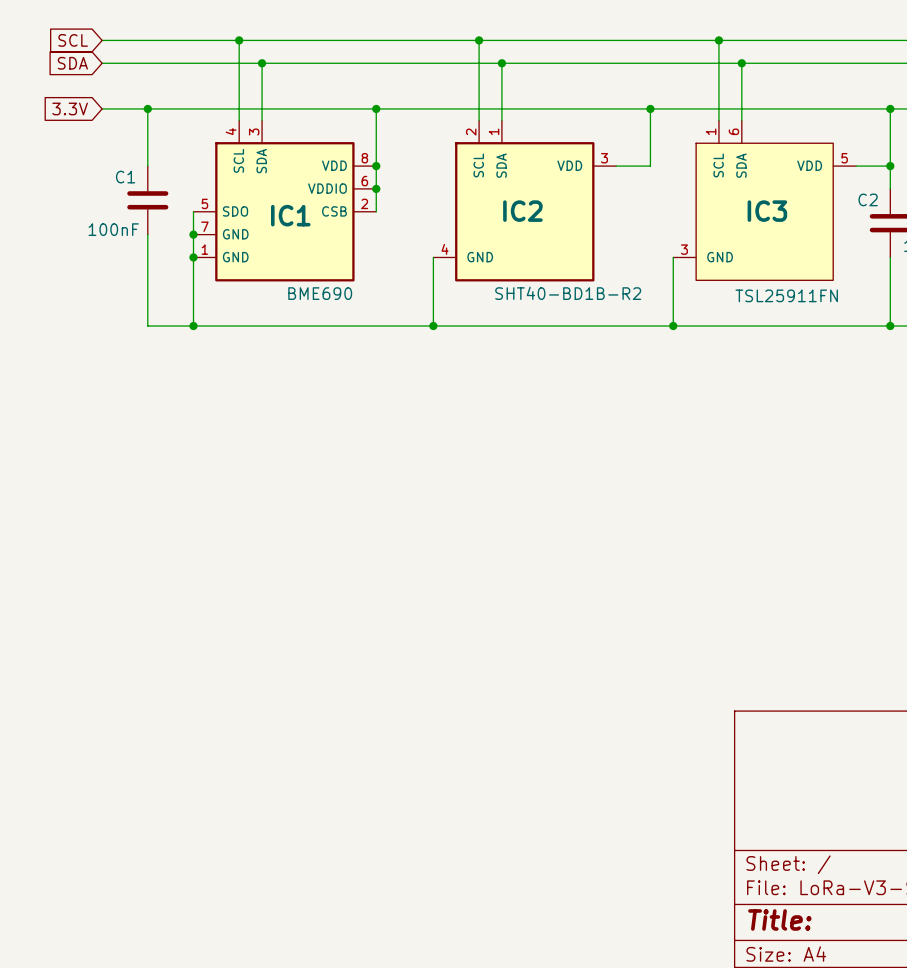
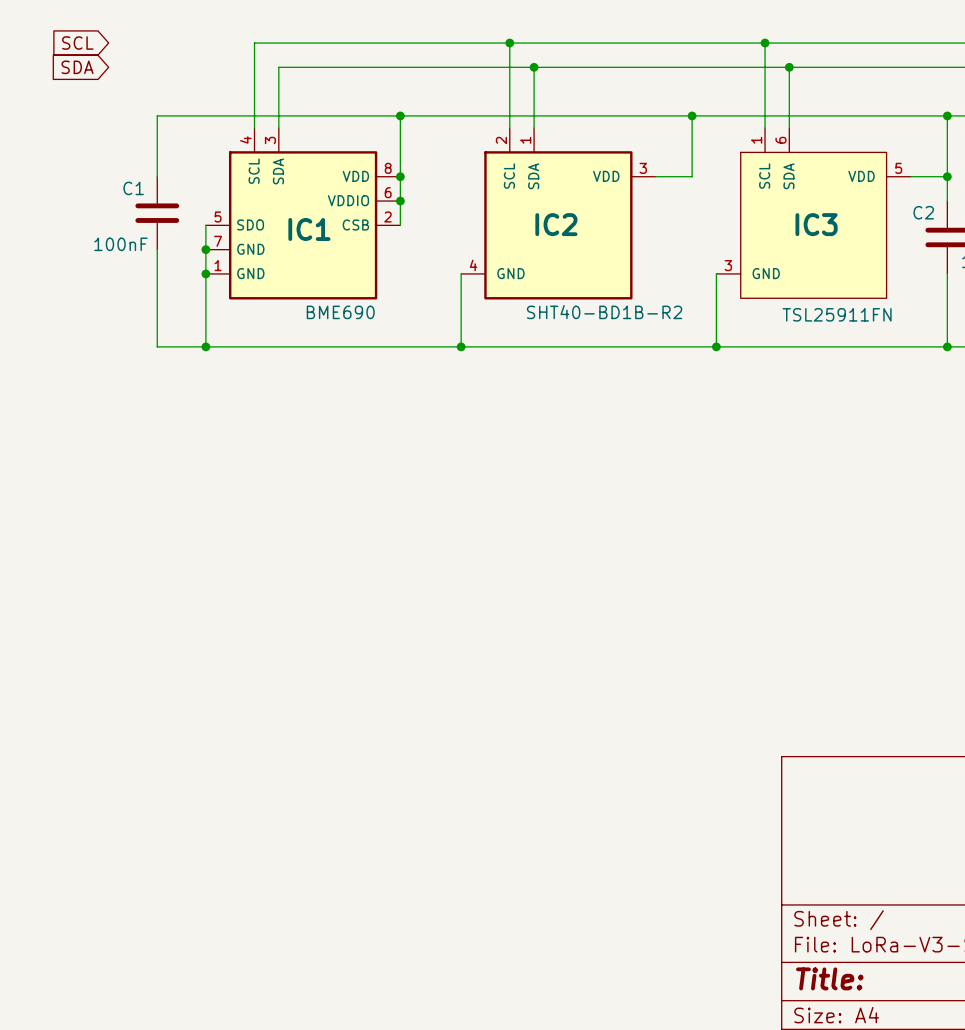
wire: (102, 40) (239, 40) -> none
junction: (239, 40) -> none
wire: (102, 63) (262, 63) -> none
junction: (262, 63) -> none
global label: 3.3V (70, 108) -> none
wire: (102, 108) (147, 108) -> none
junction: (147, 108) -> none

